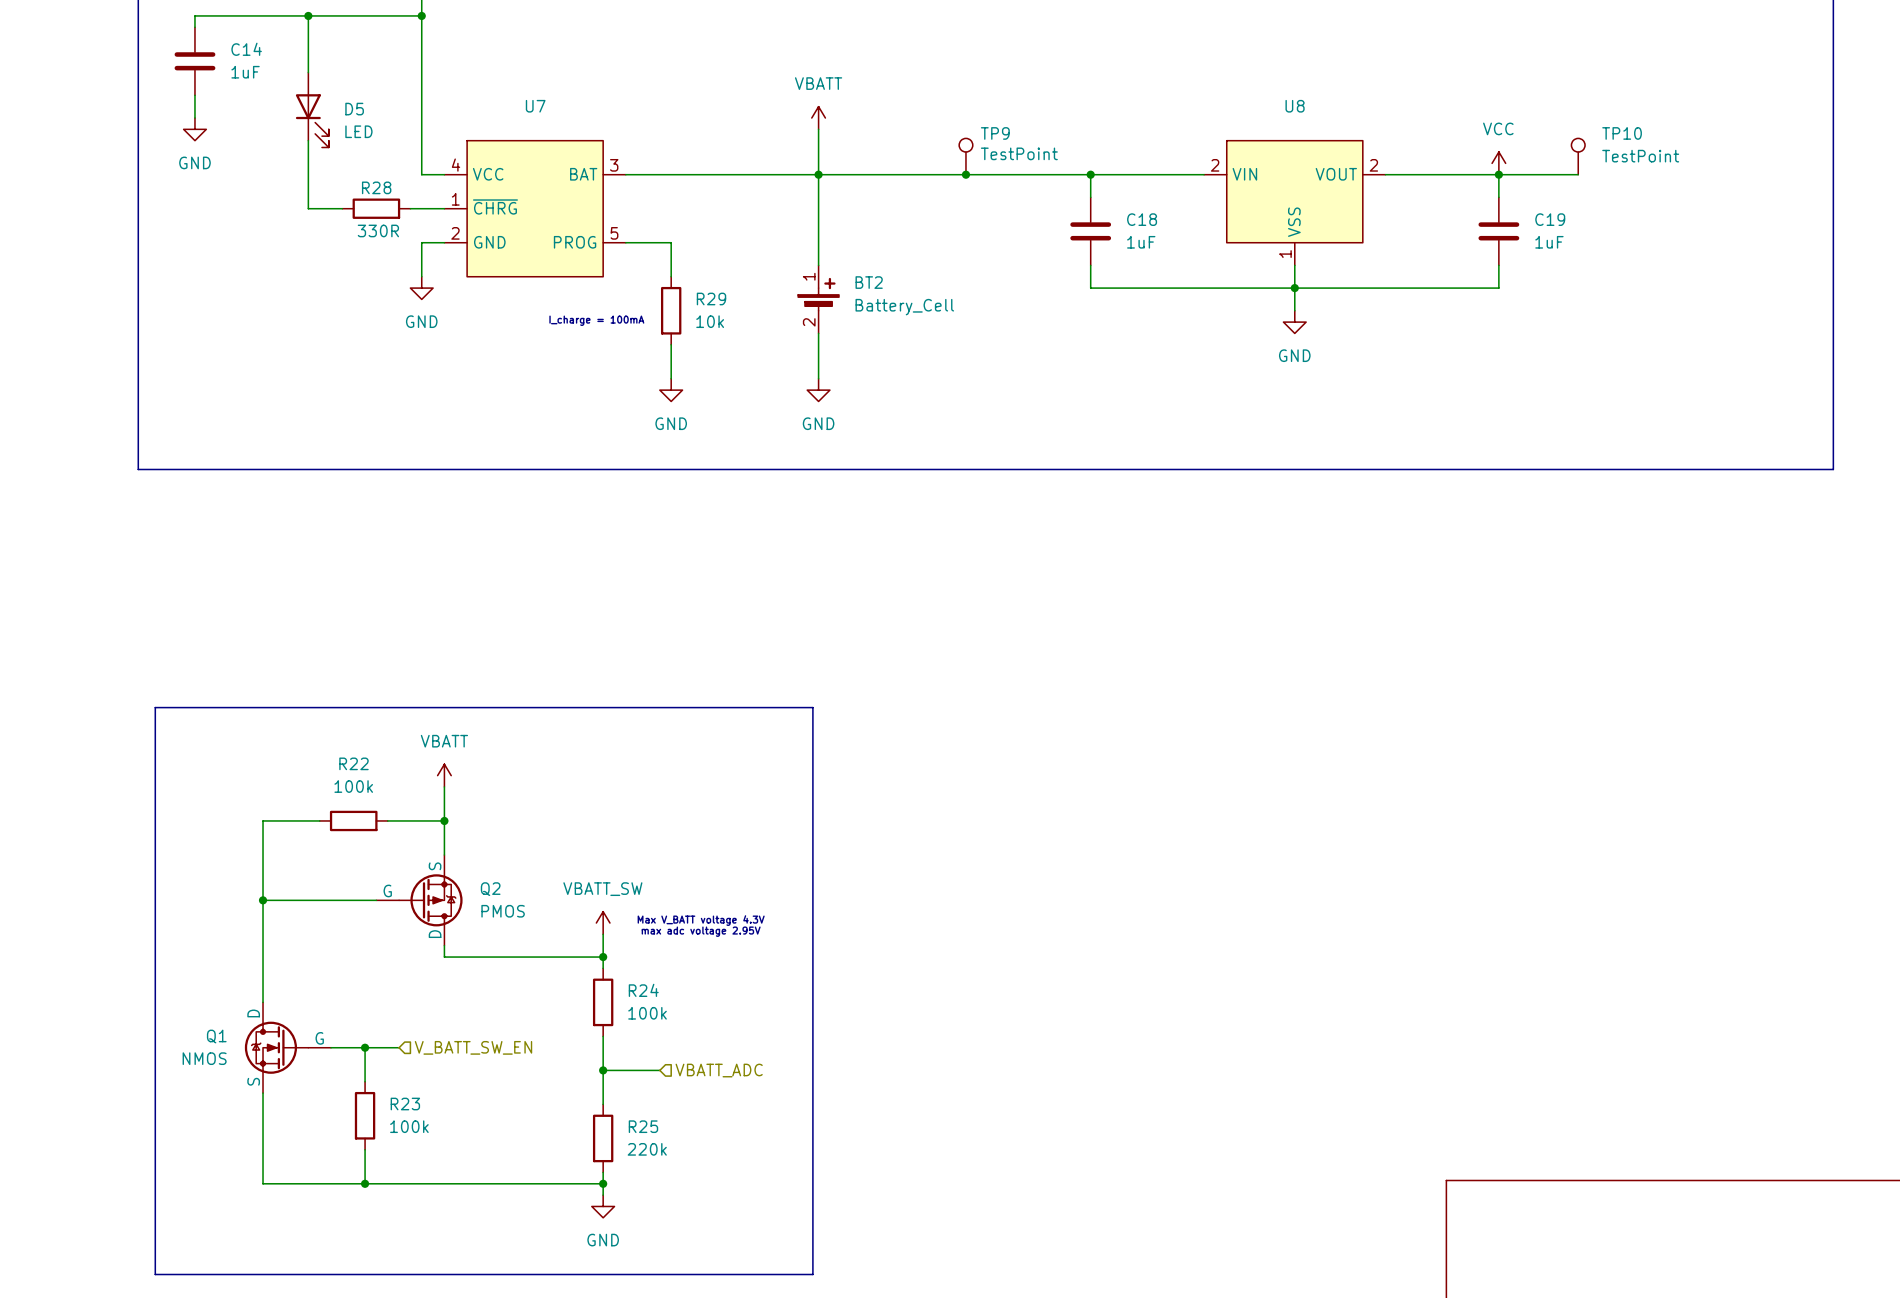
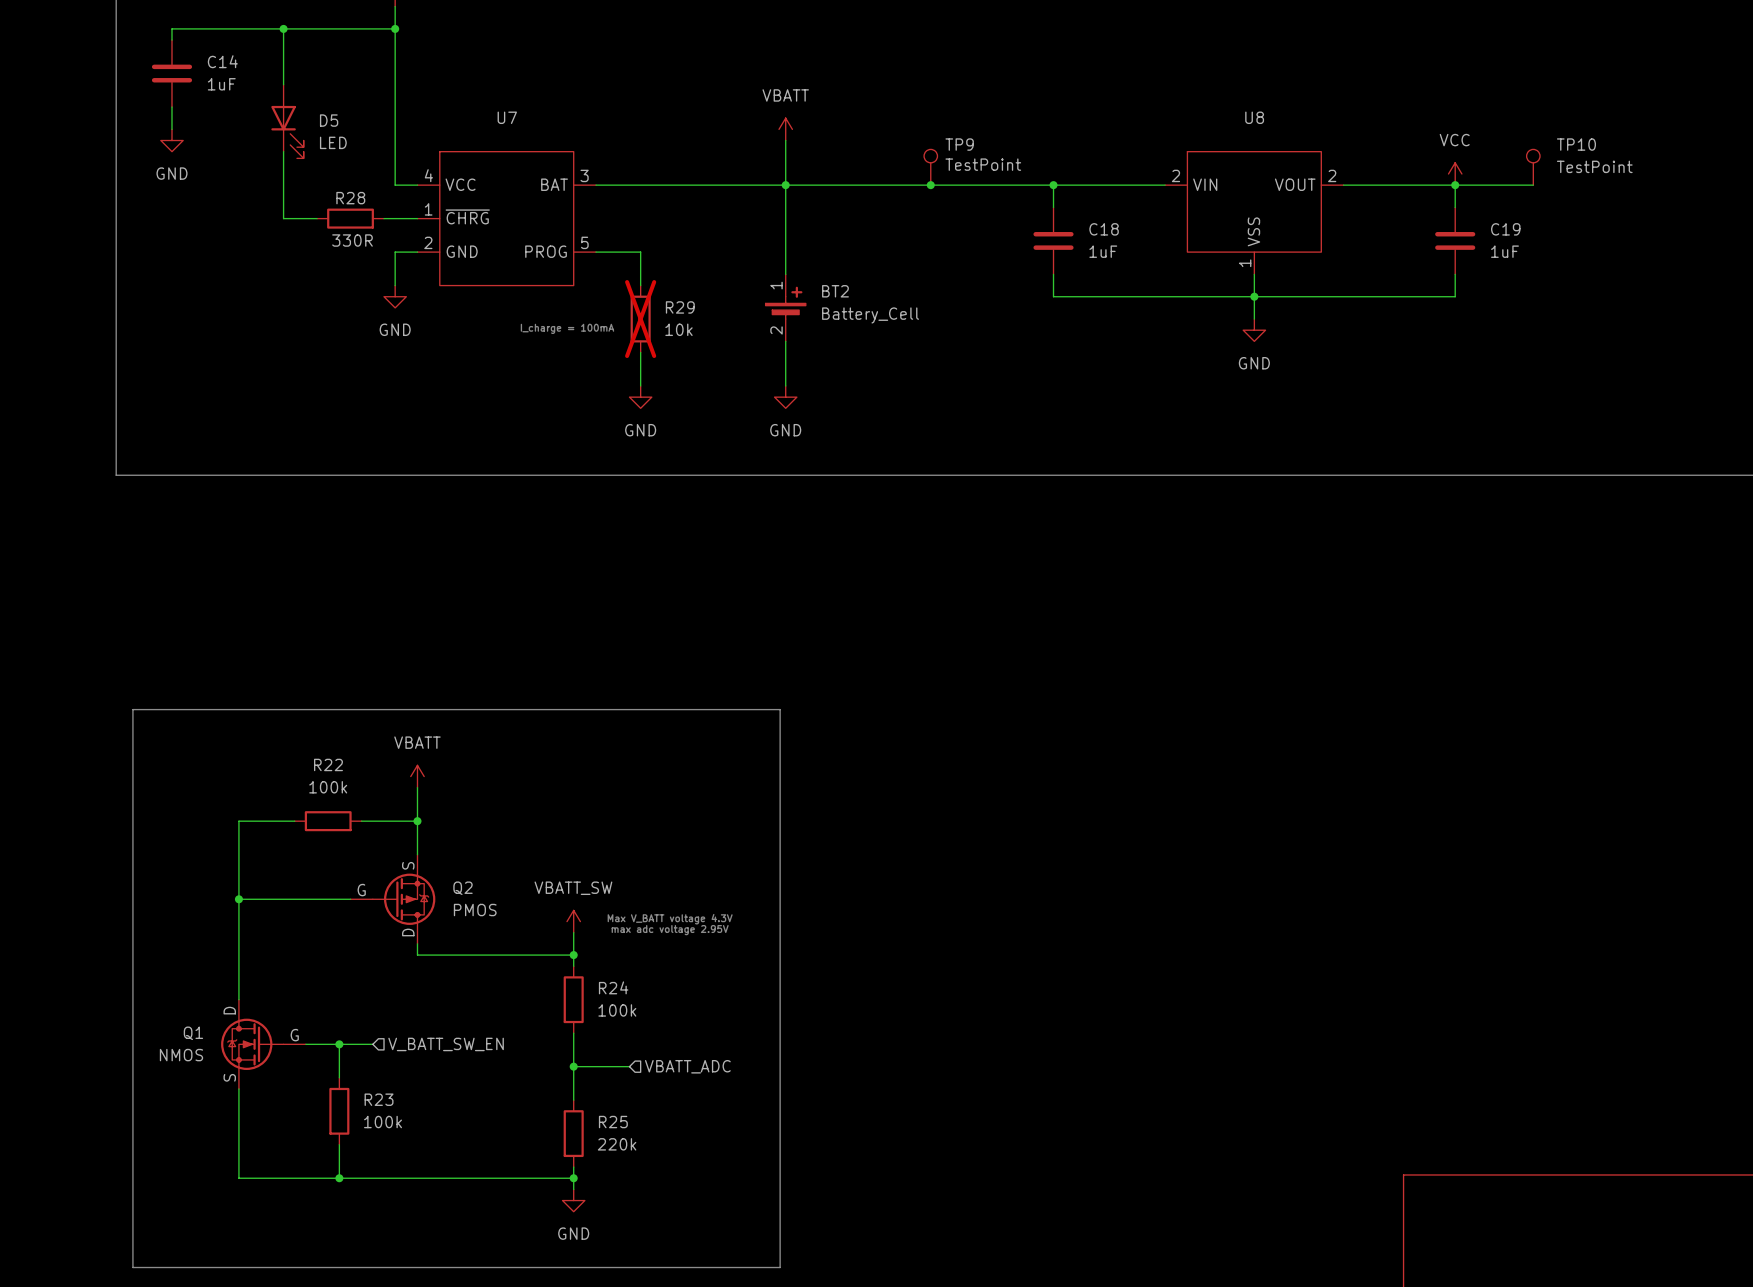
R29 do-not-place cross: none -> (640, 319)

